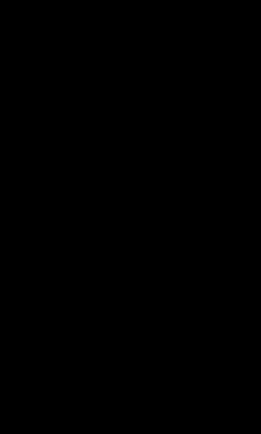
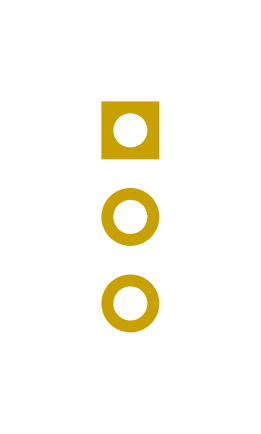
part: none -> (130, 216)

